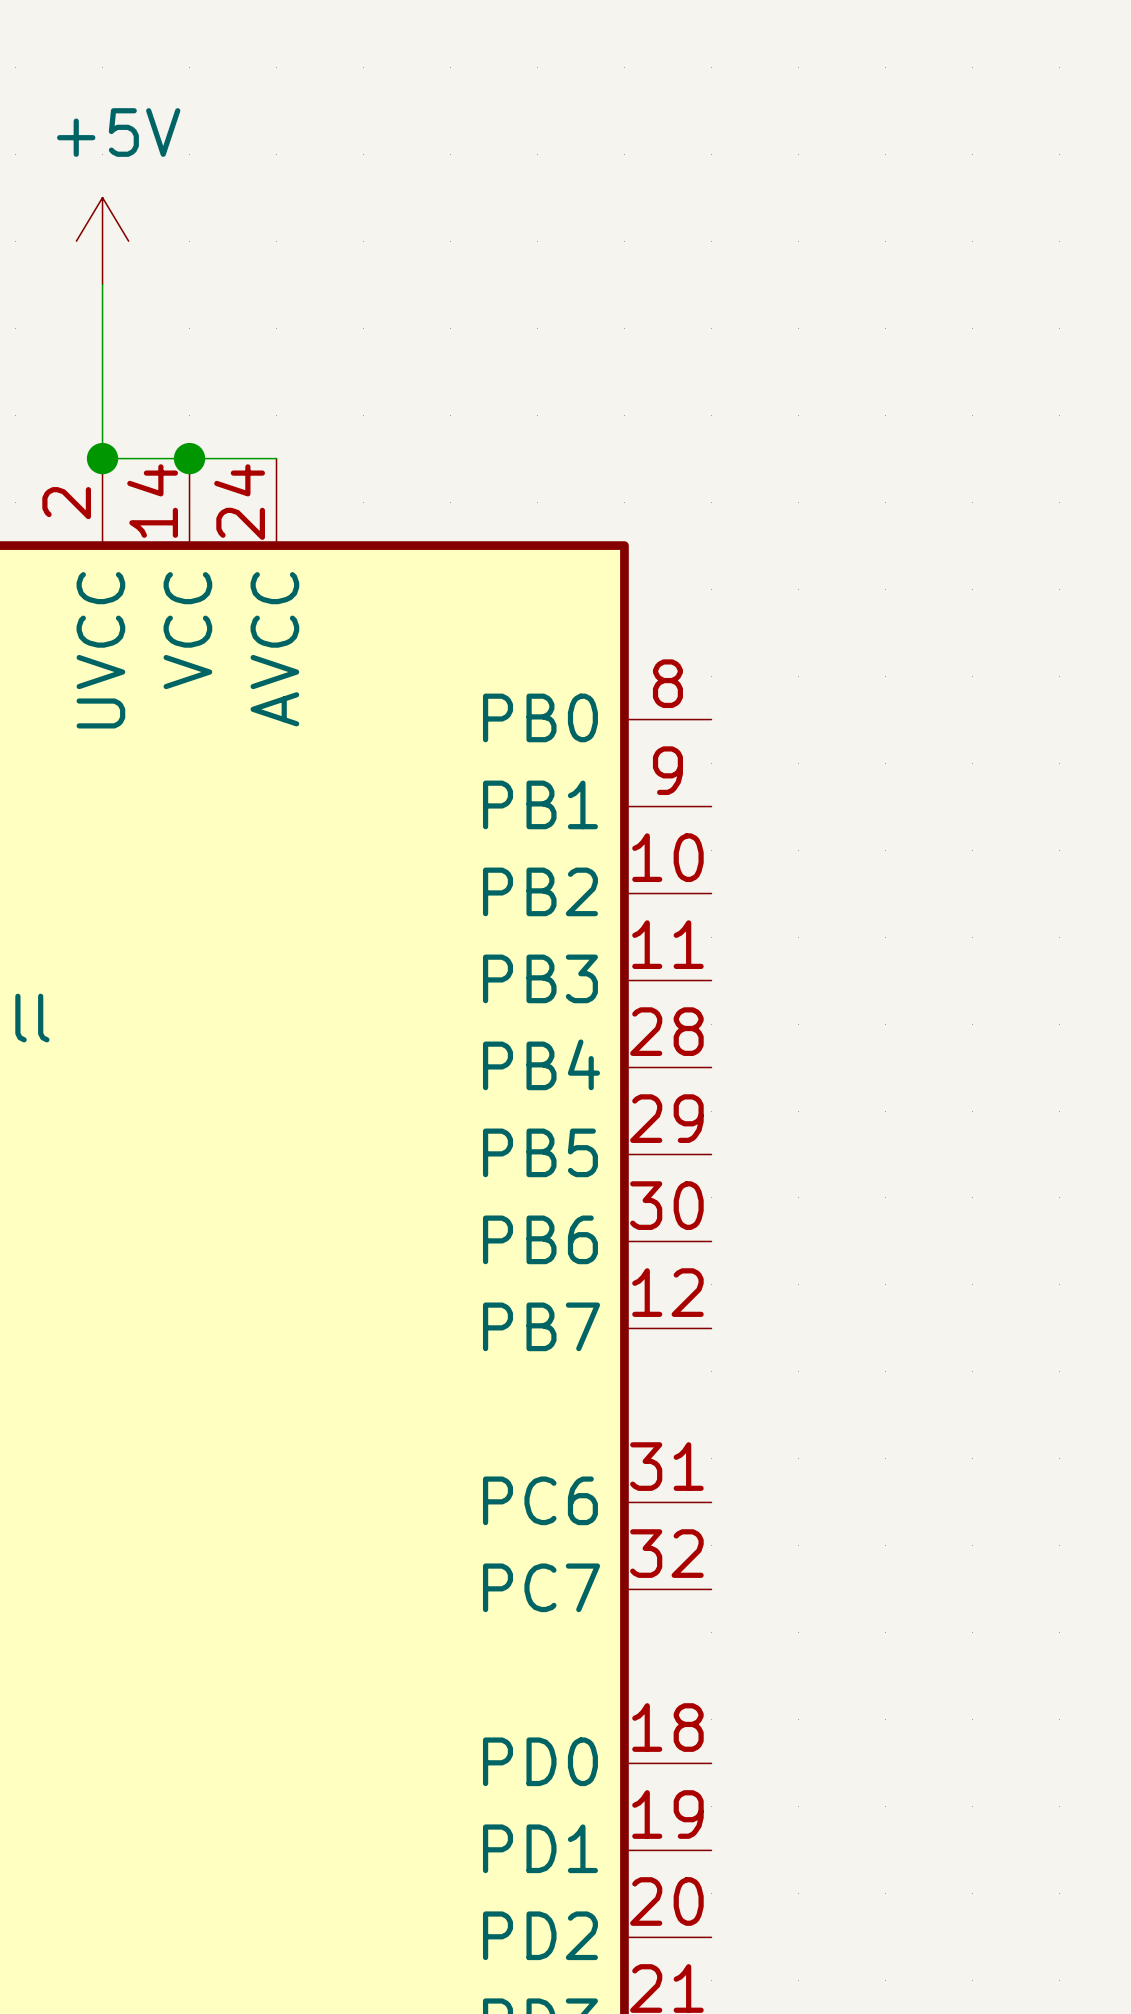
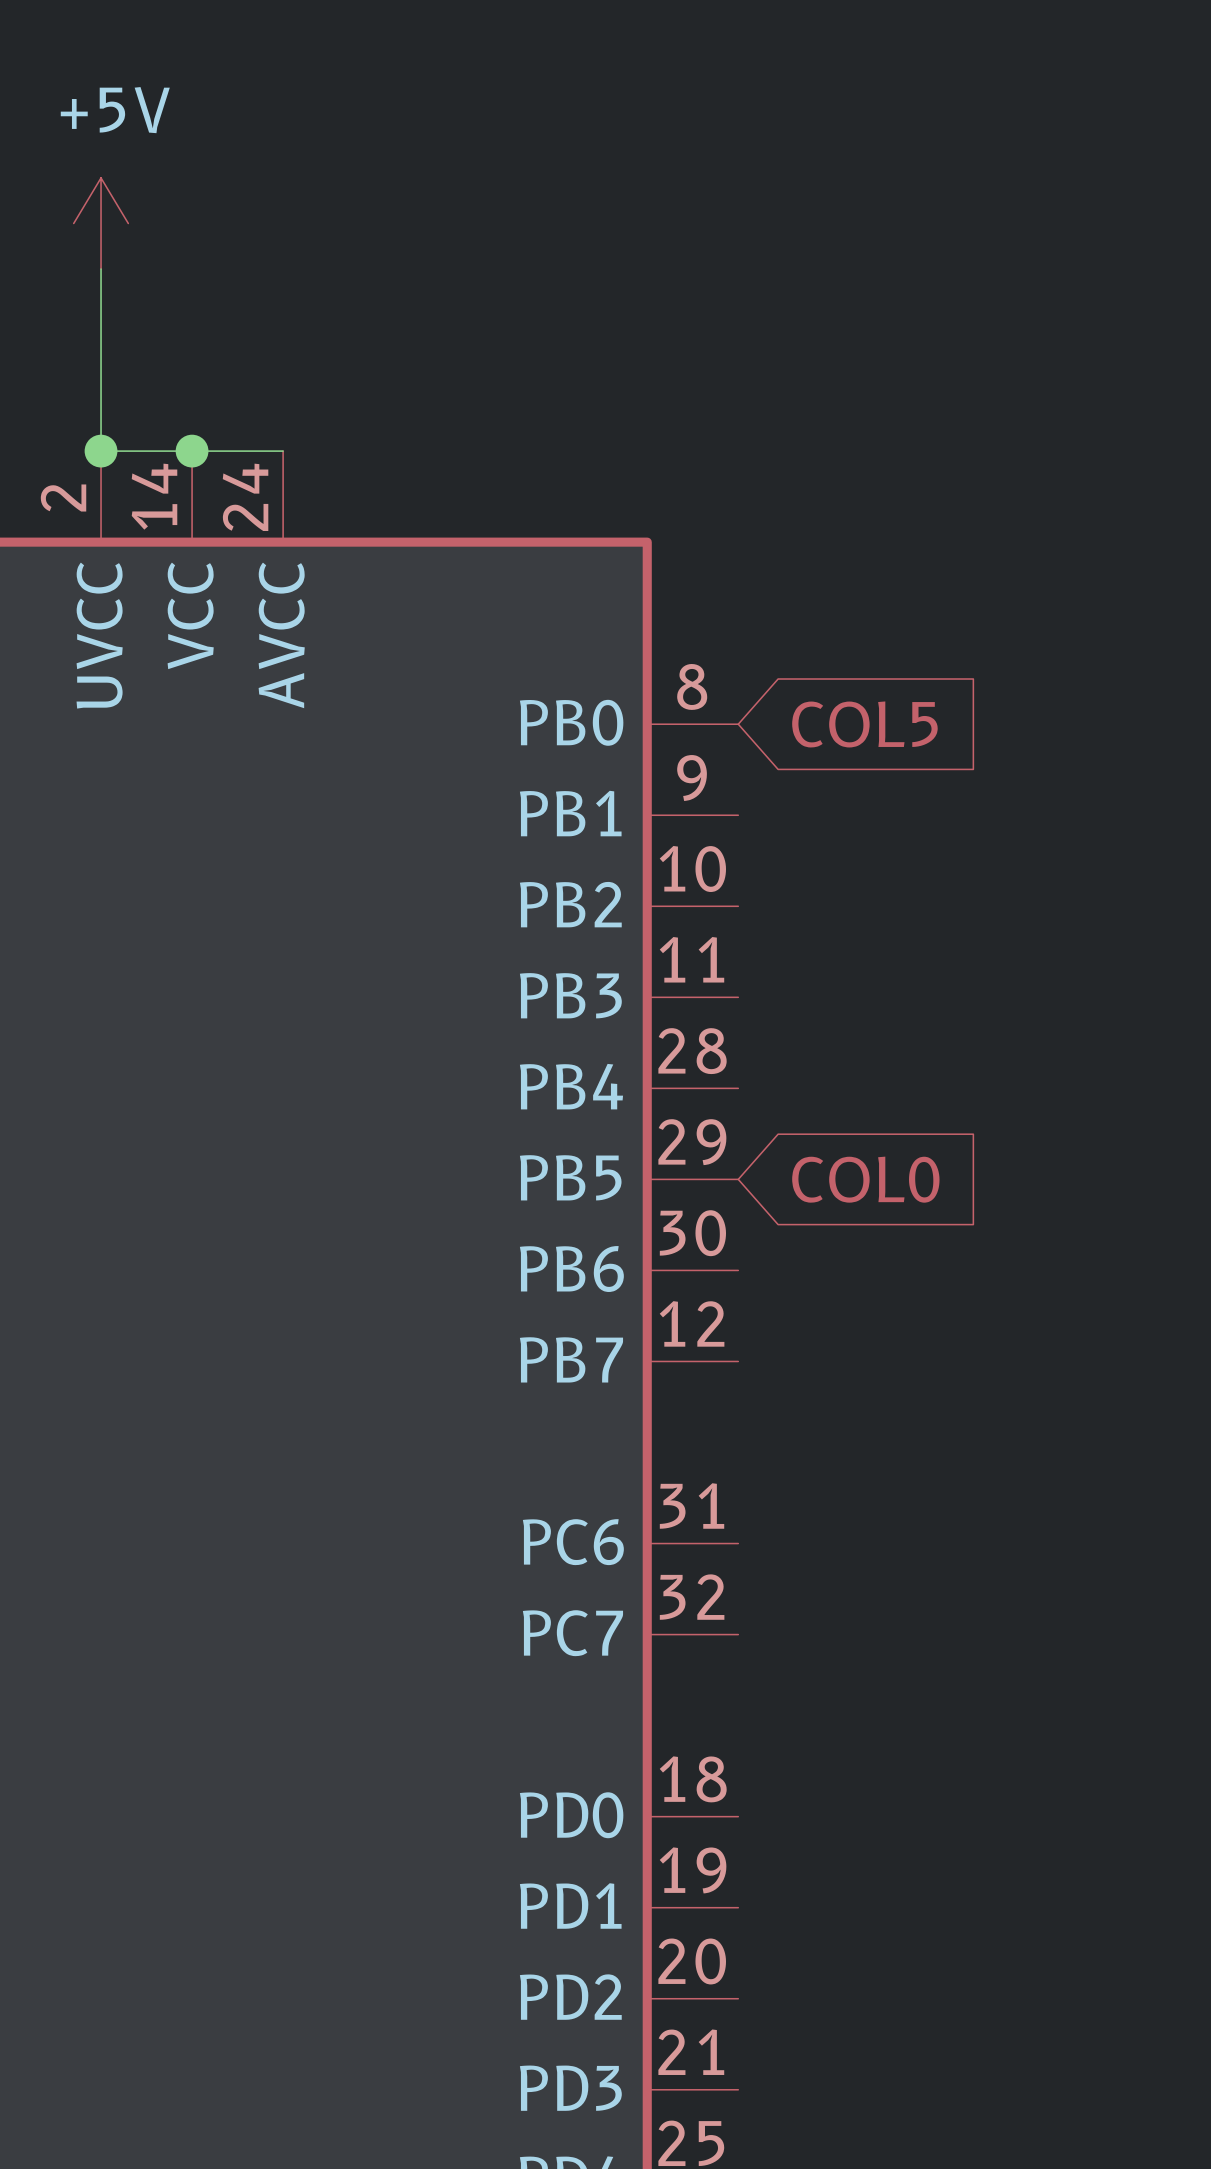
global label: none -> COL5 (864, 724)
global label: none -> COL0 (865, 1179)

